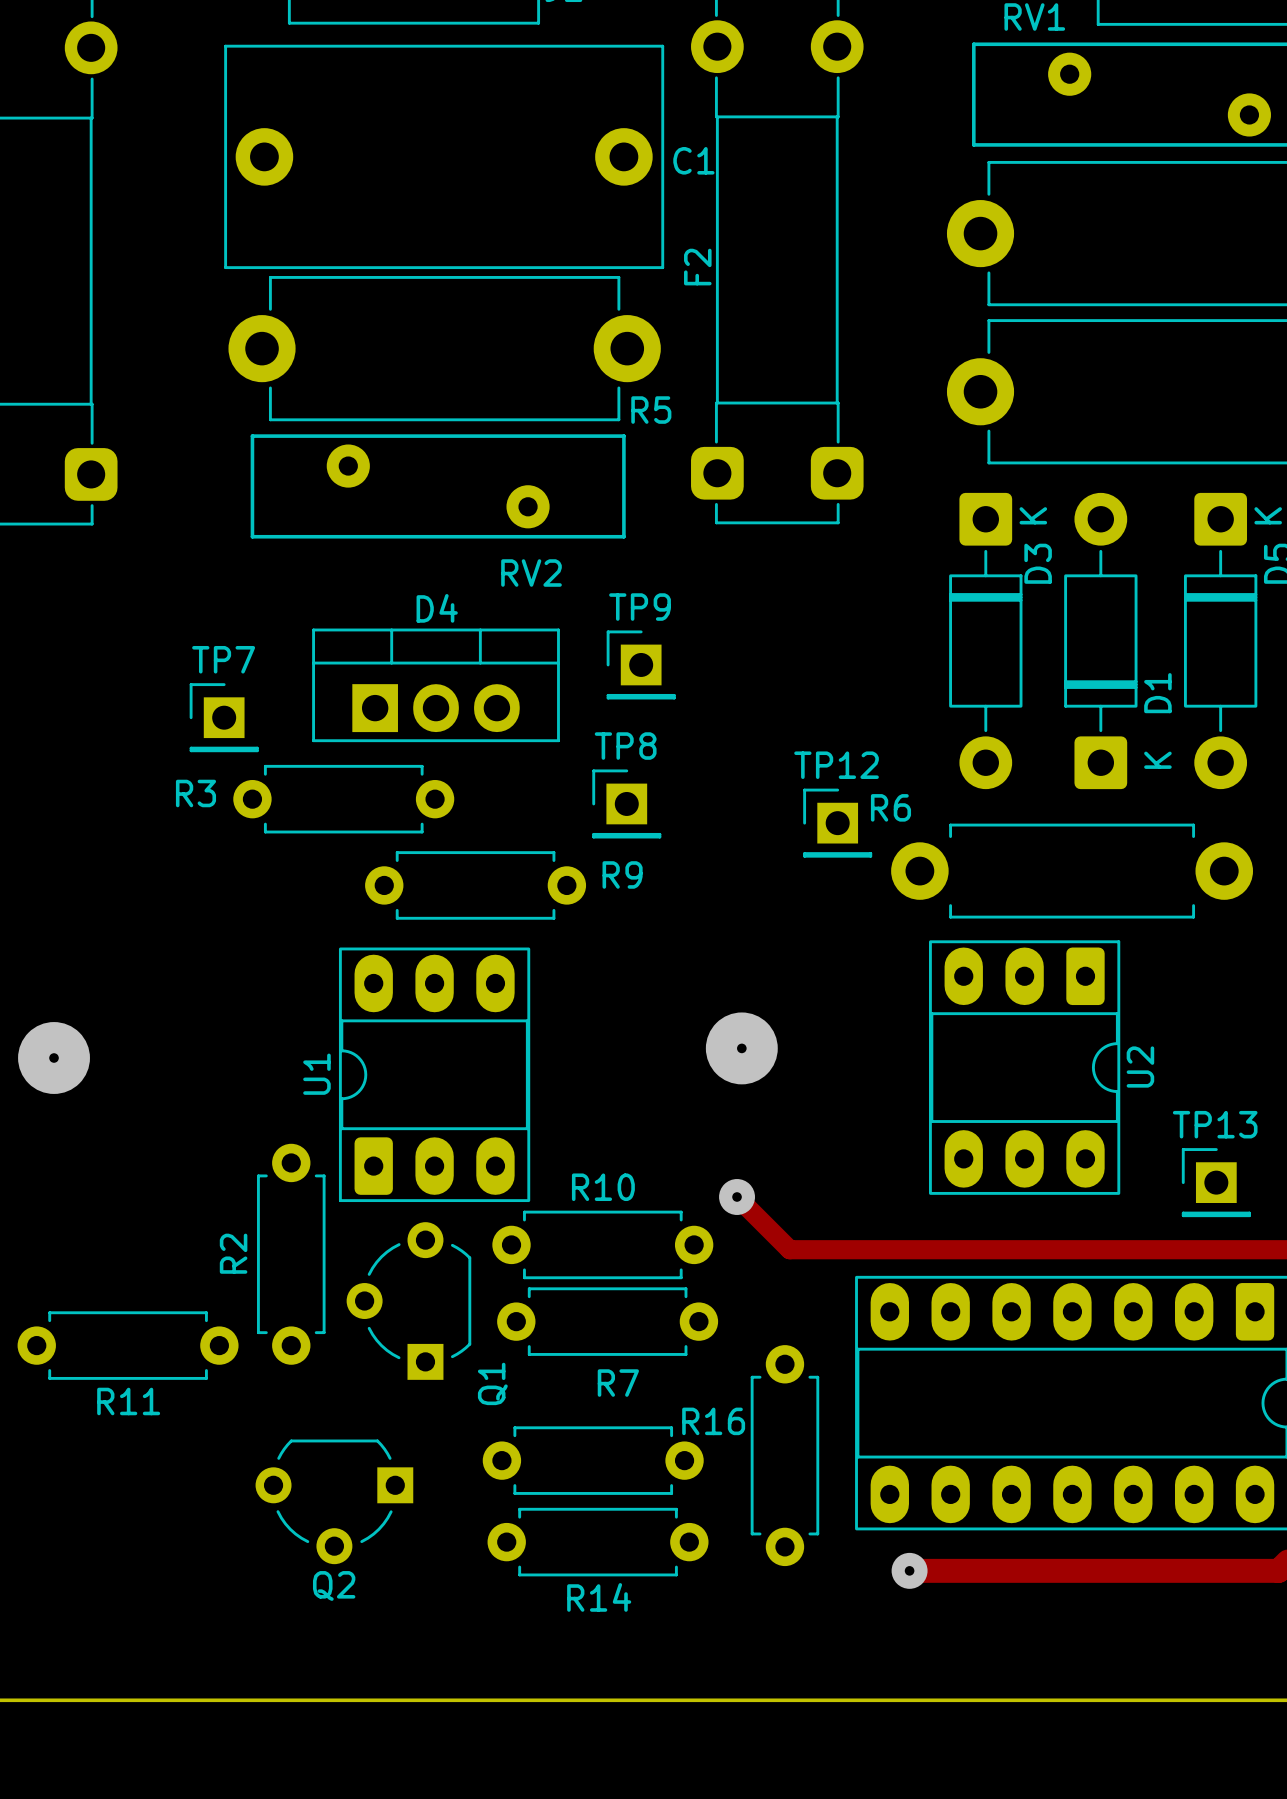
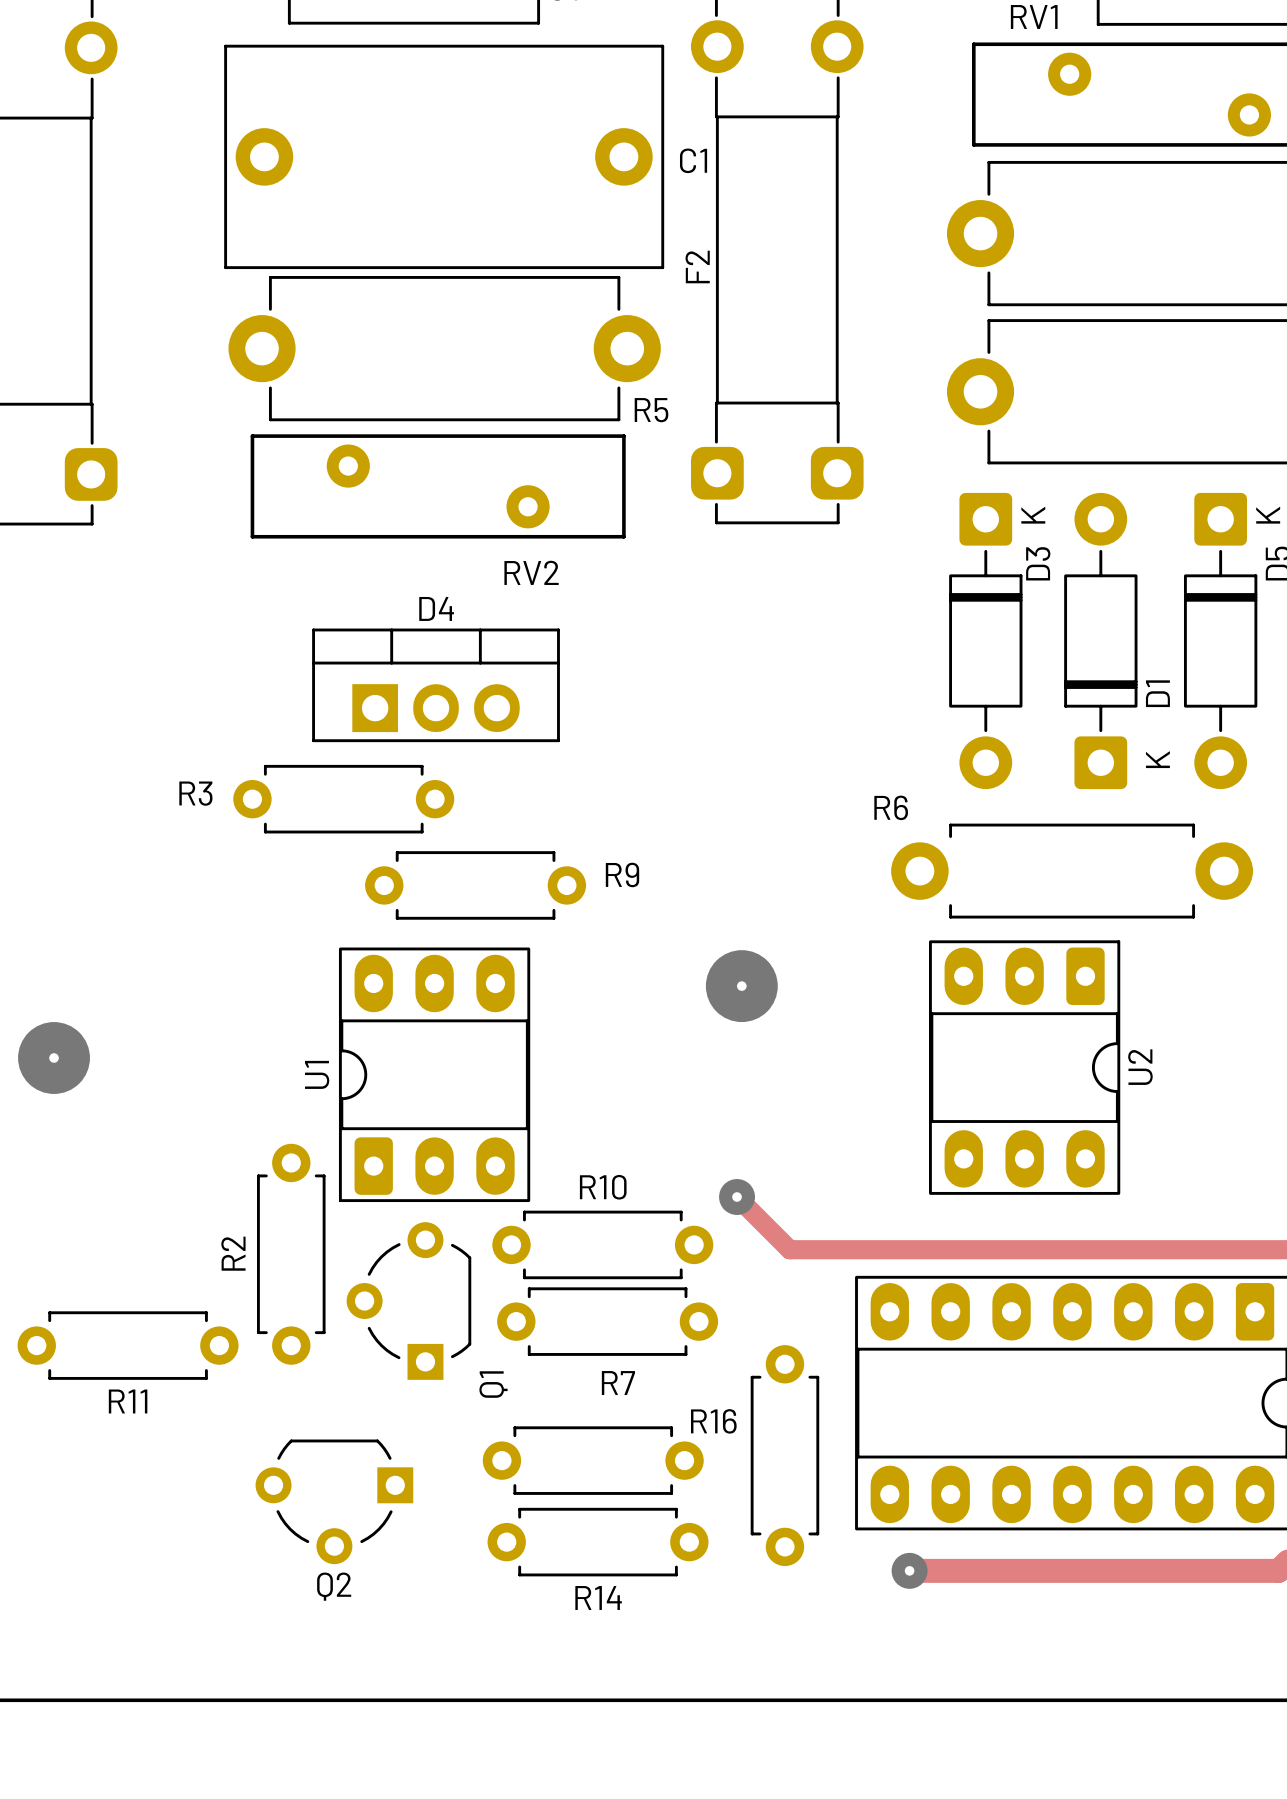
TP9: (641, 664) -> none
TP7: (224, 717) -> none
TP8: (626, 803) -> none
TP12: (837, 823) -> none
via position: (741, 1048) -> (741, 986)
TP13: (1216, 1182) -> none

